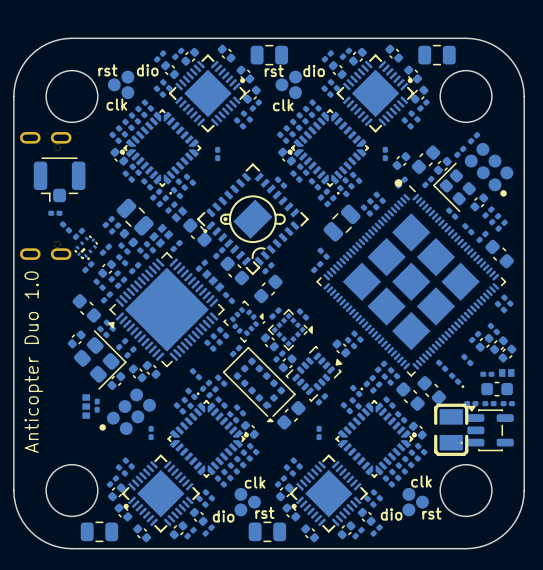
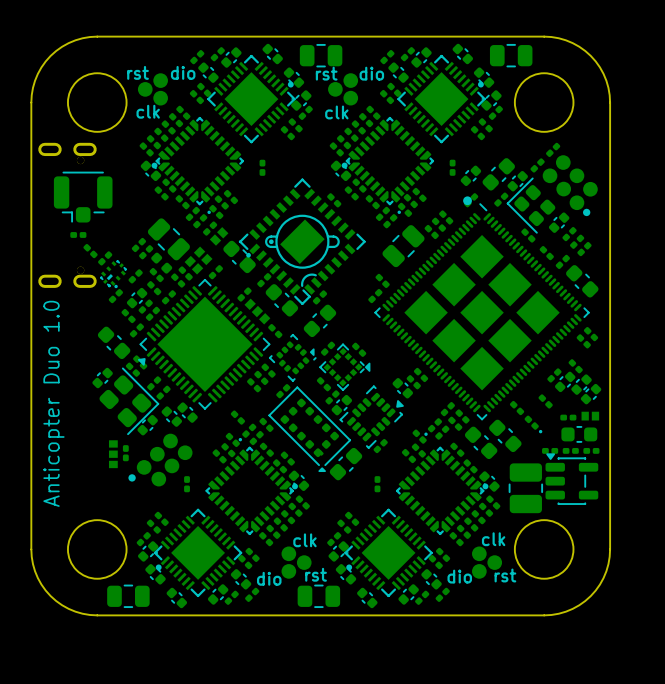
part footprint: [260, 333, 279, 352] -> [316, 377, 332, 392]
part footprint: [434, 403, 469, 456] -> [508, 463, 544, 514]

